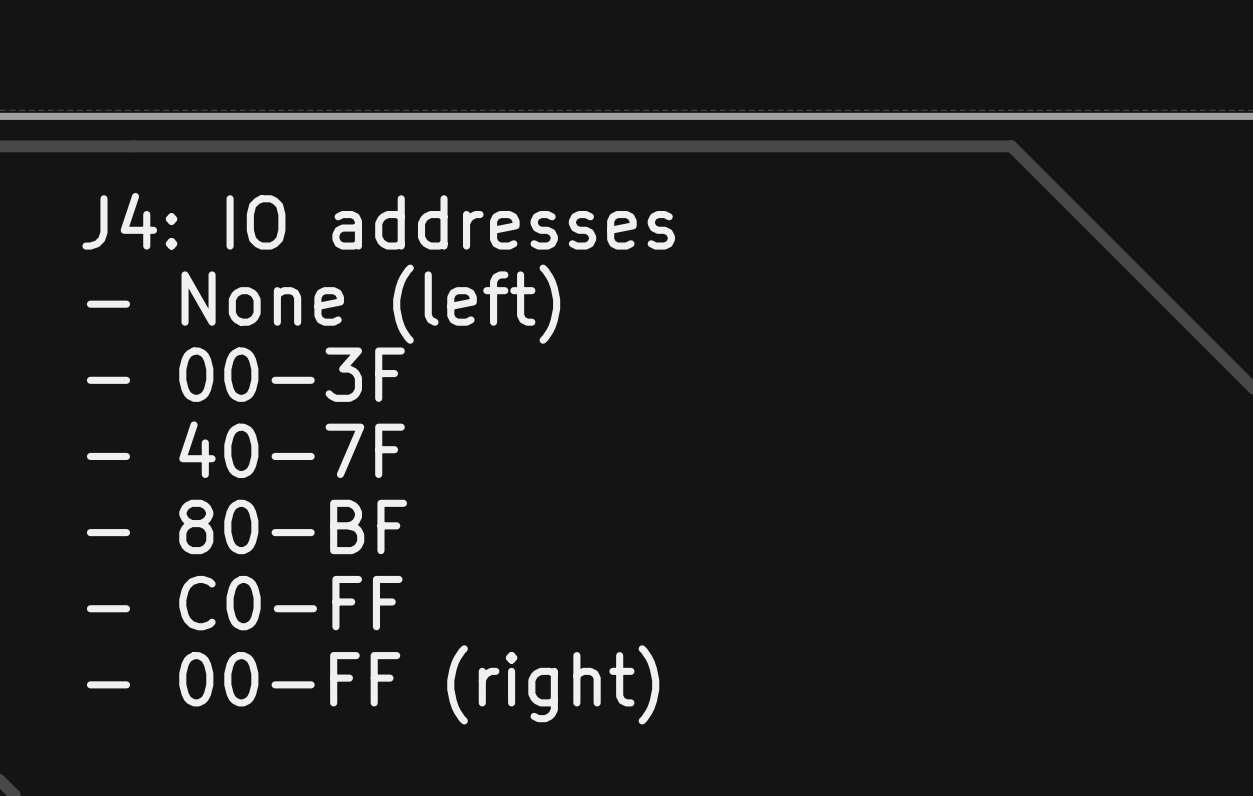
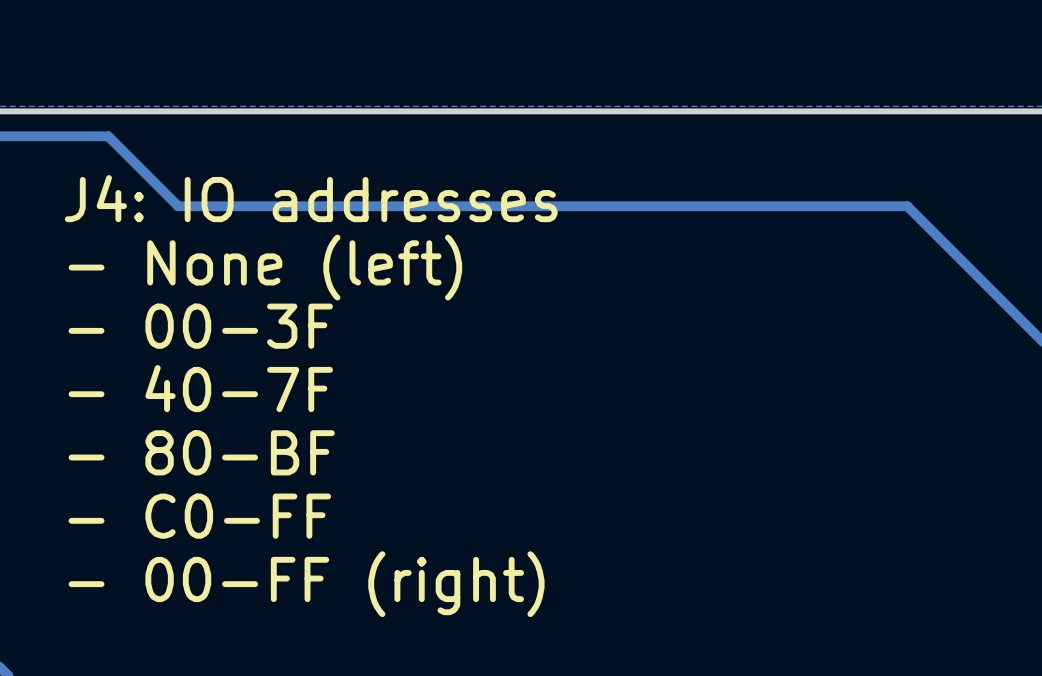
track: (134, 146) (1011, 146) (1095, 230) -> (108, 136) (178, 206) (907, 206)

